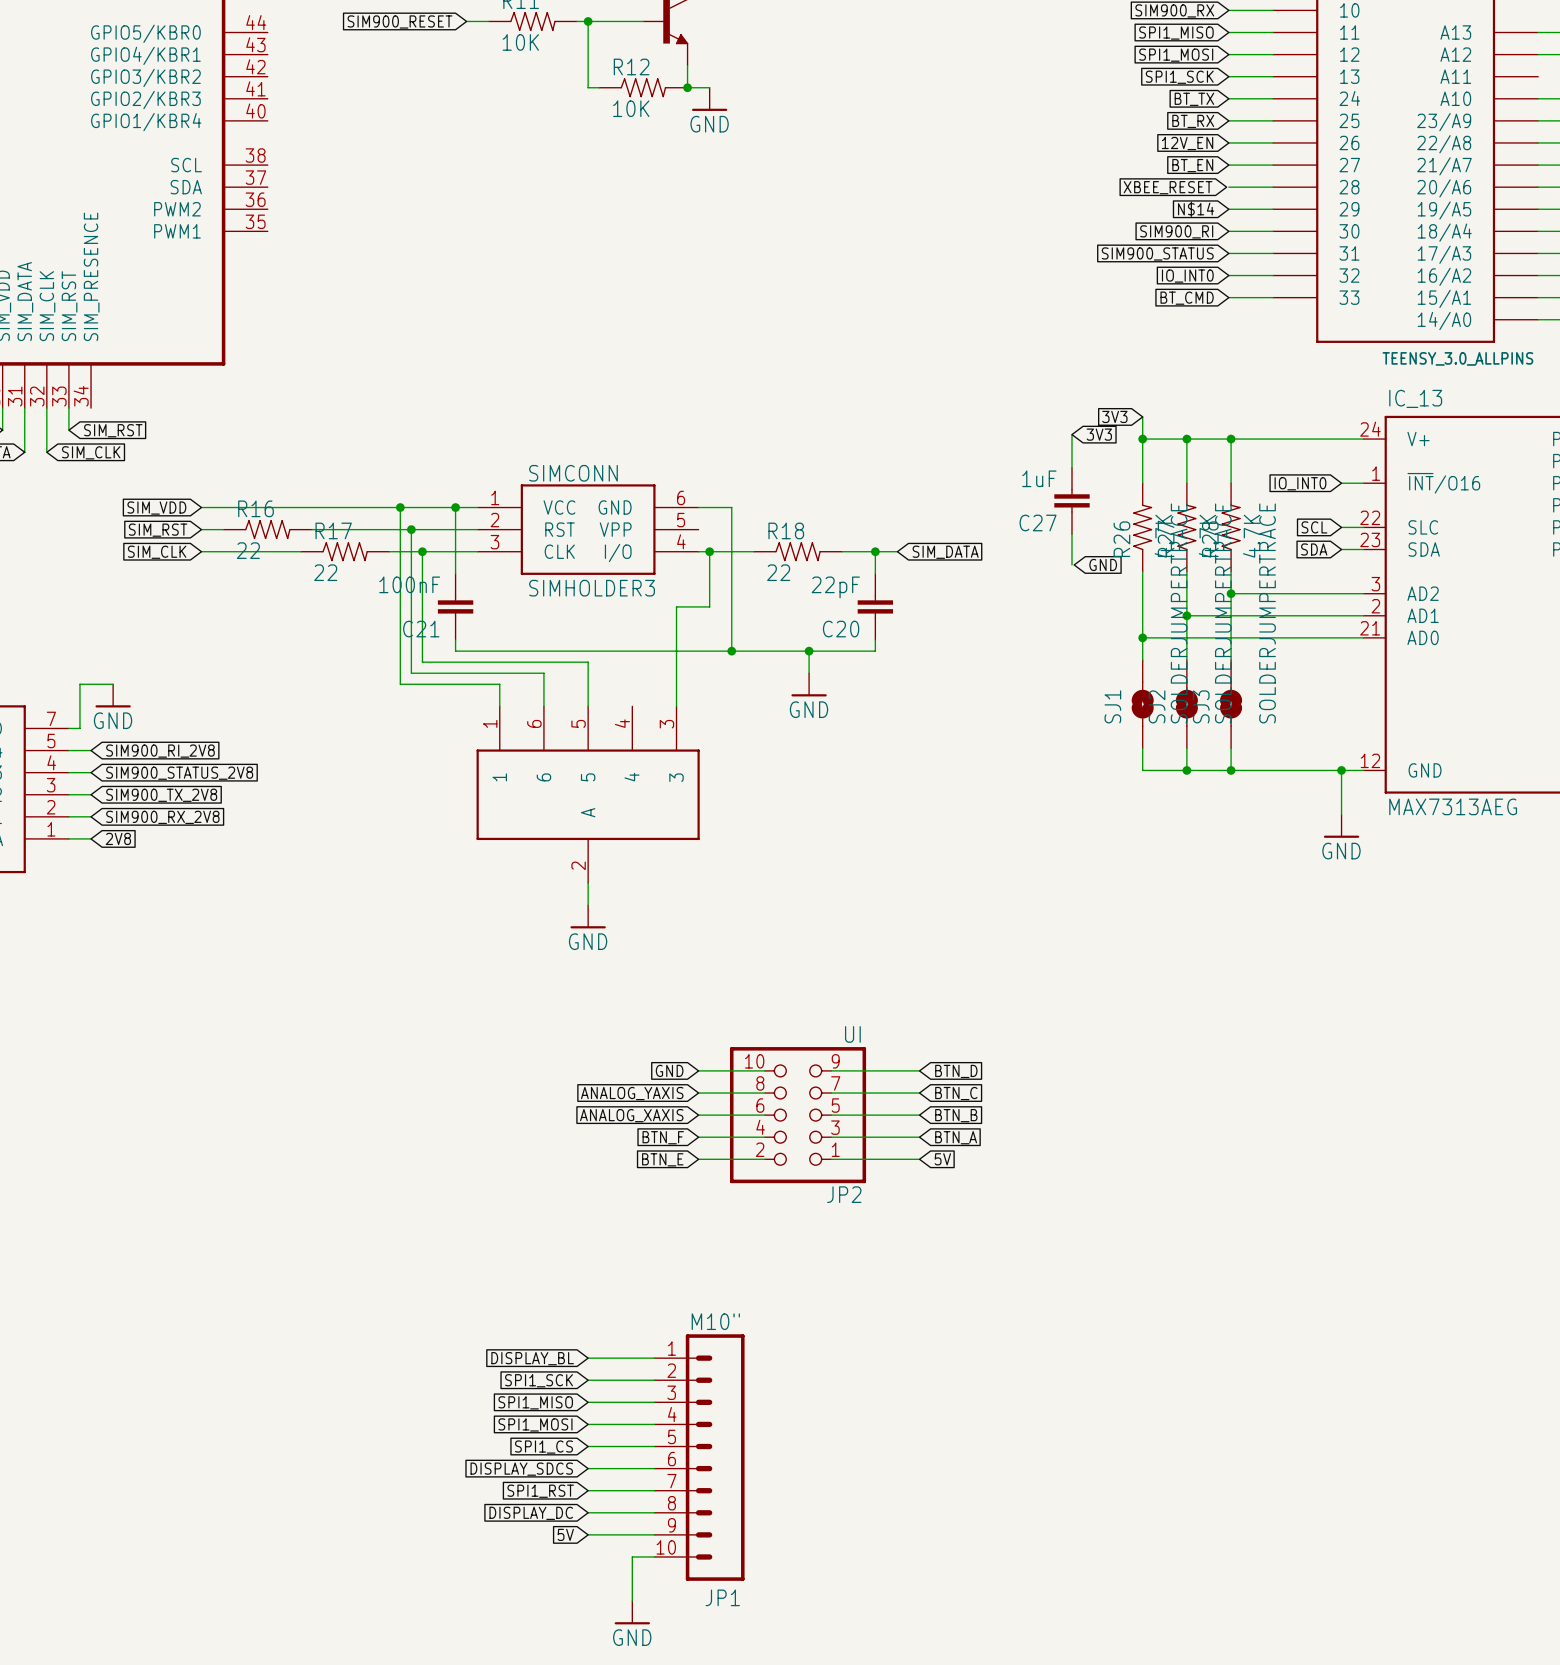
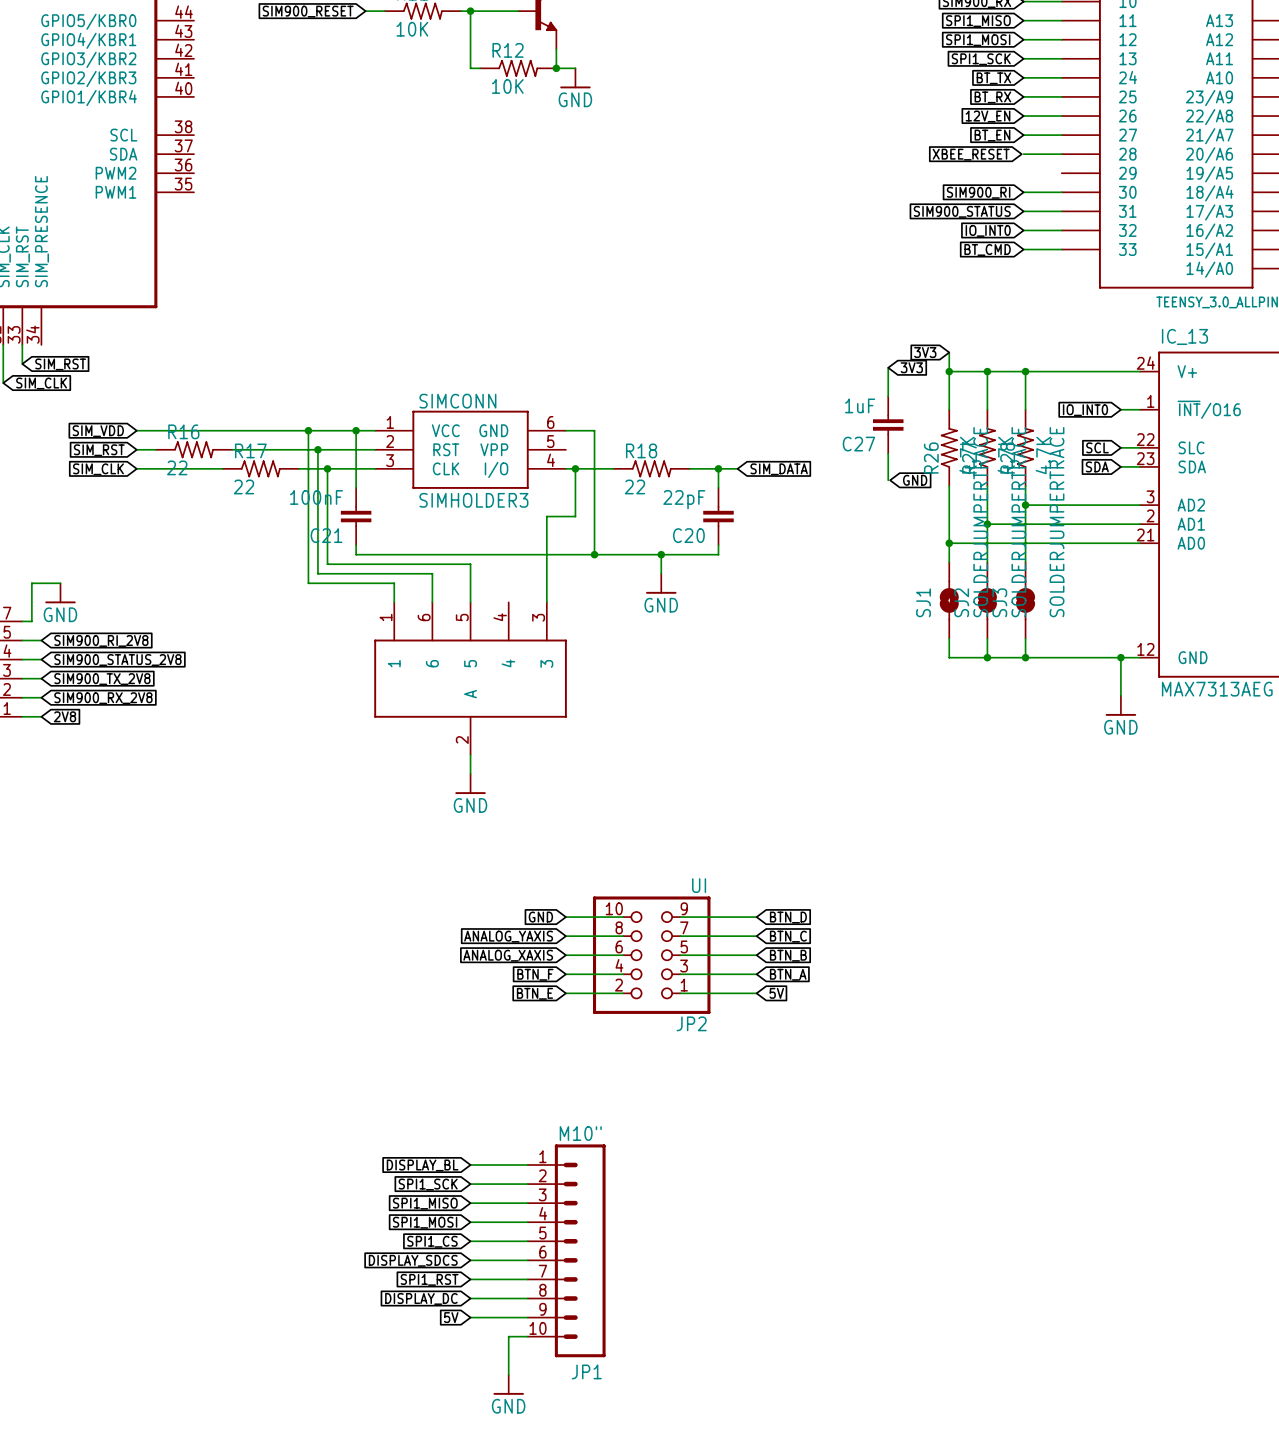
global label: N$14 (1196, 209) -> none
wire: (1228, 209) (1273, 209) -> none

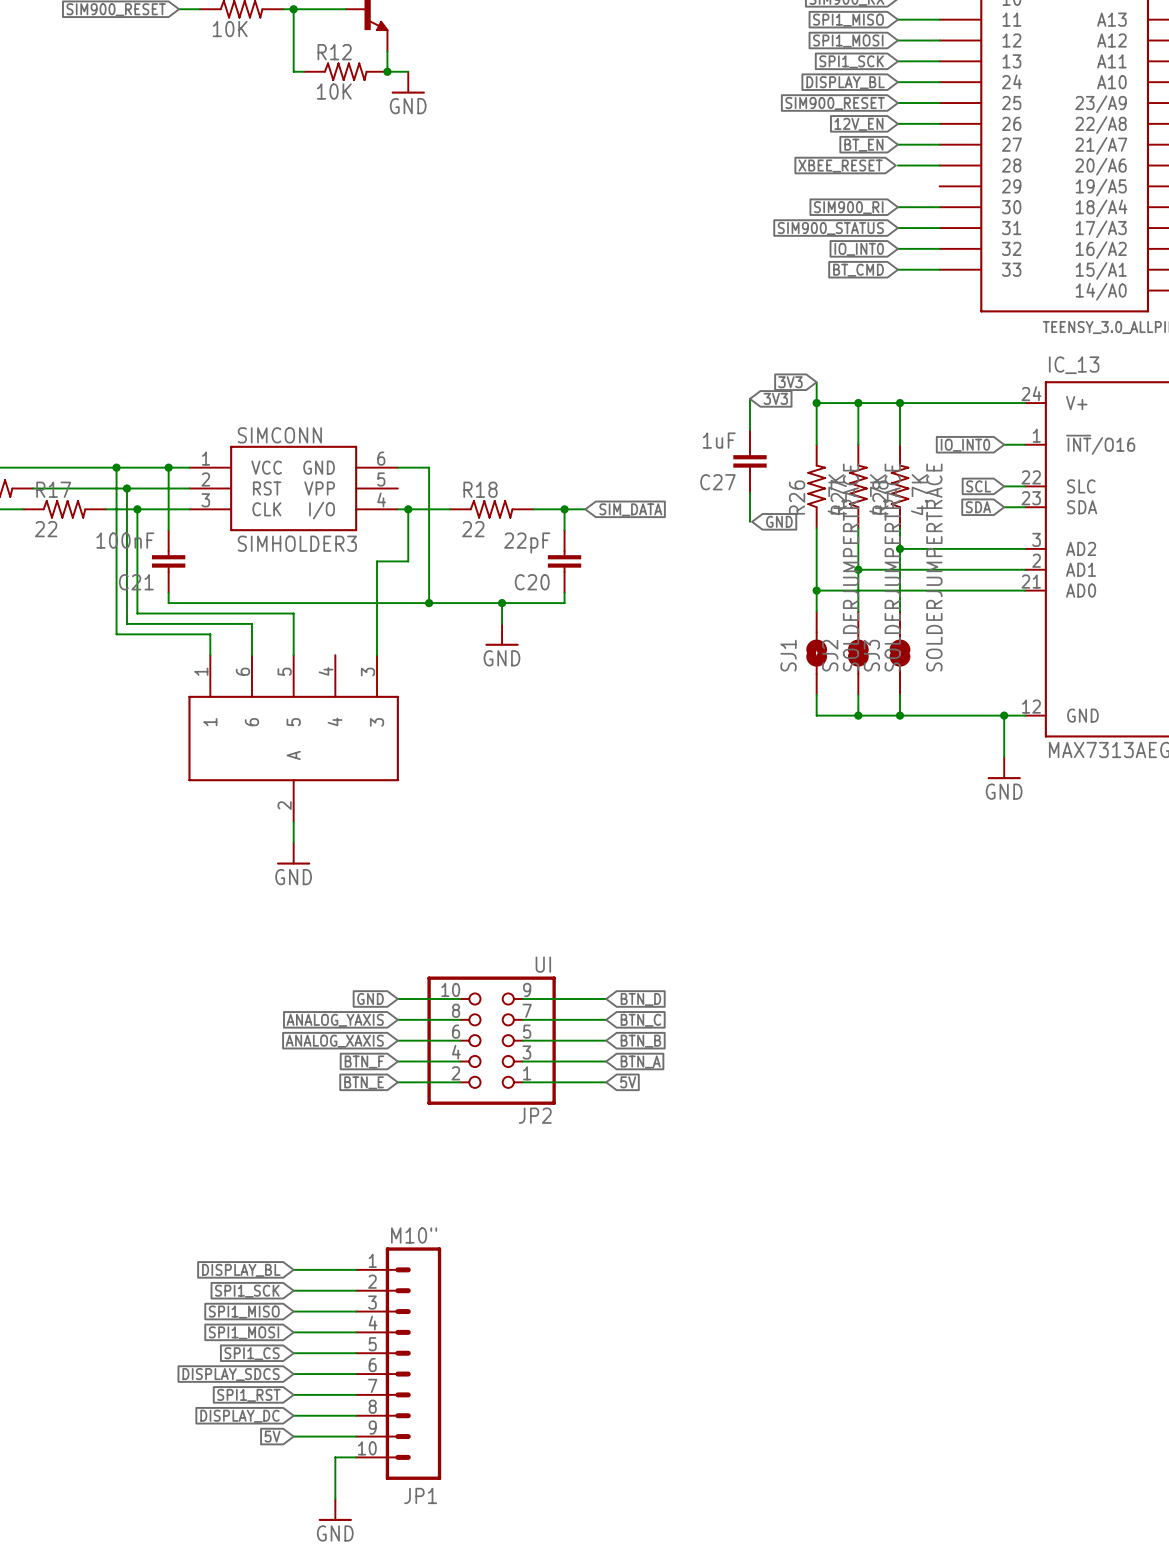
global label: BT_TX (993, 78) -> DISPLAY_BL (845, 82)
global label: BT_RX (992, 97) -> SIM900_RESET (835, 103)

